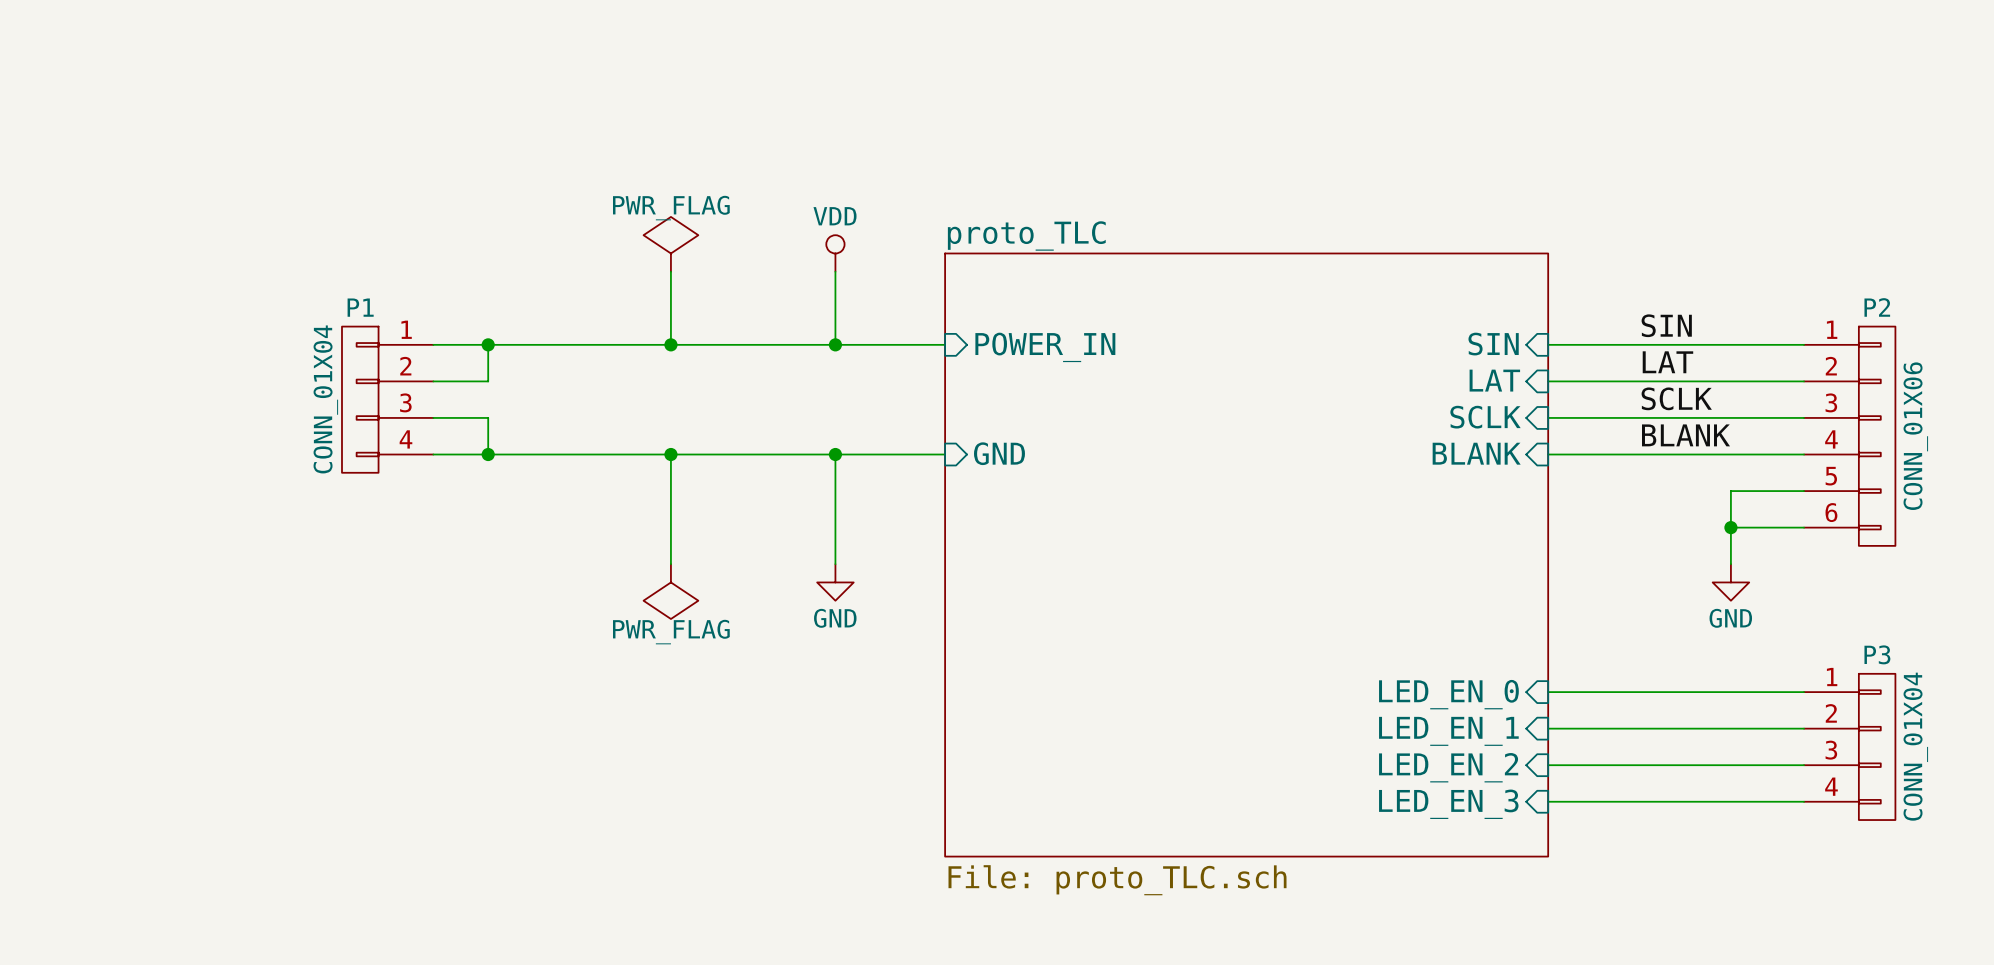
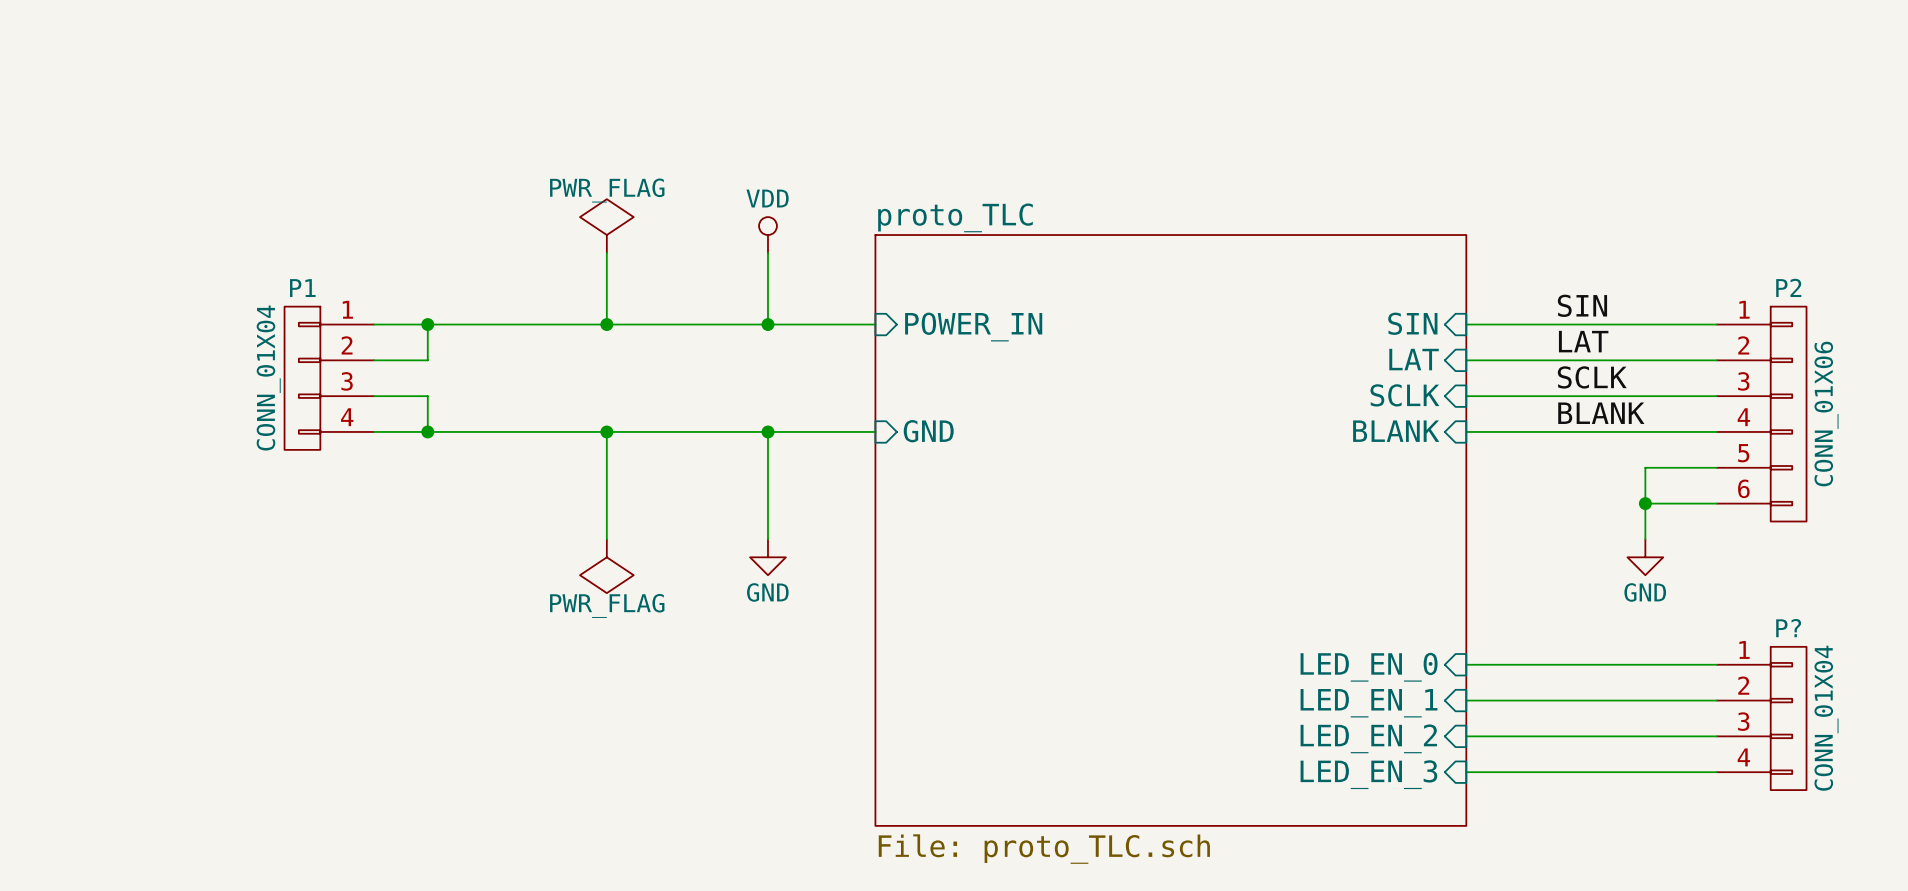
P3 name: P3 (1877, 654) -> P? (1788, 628)

